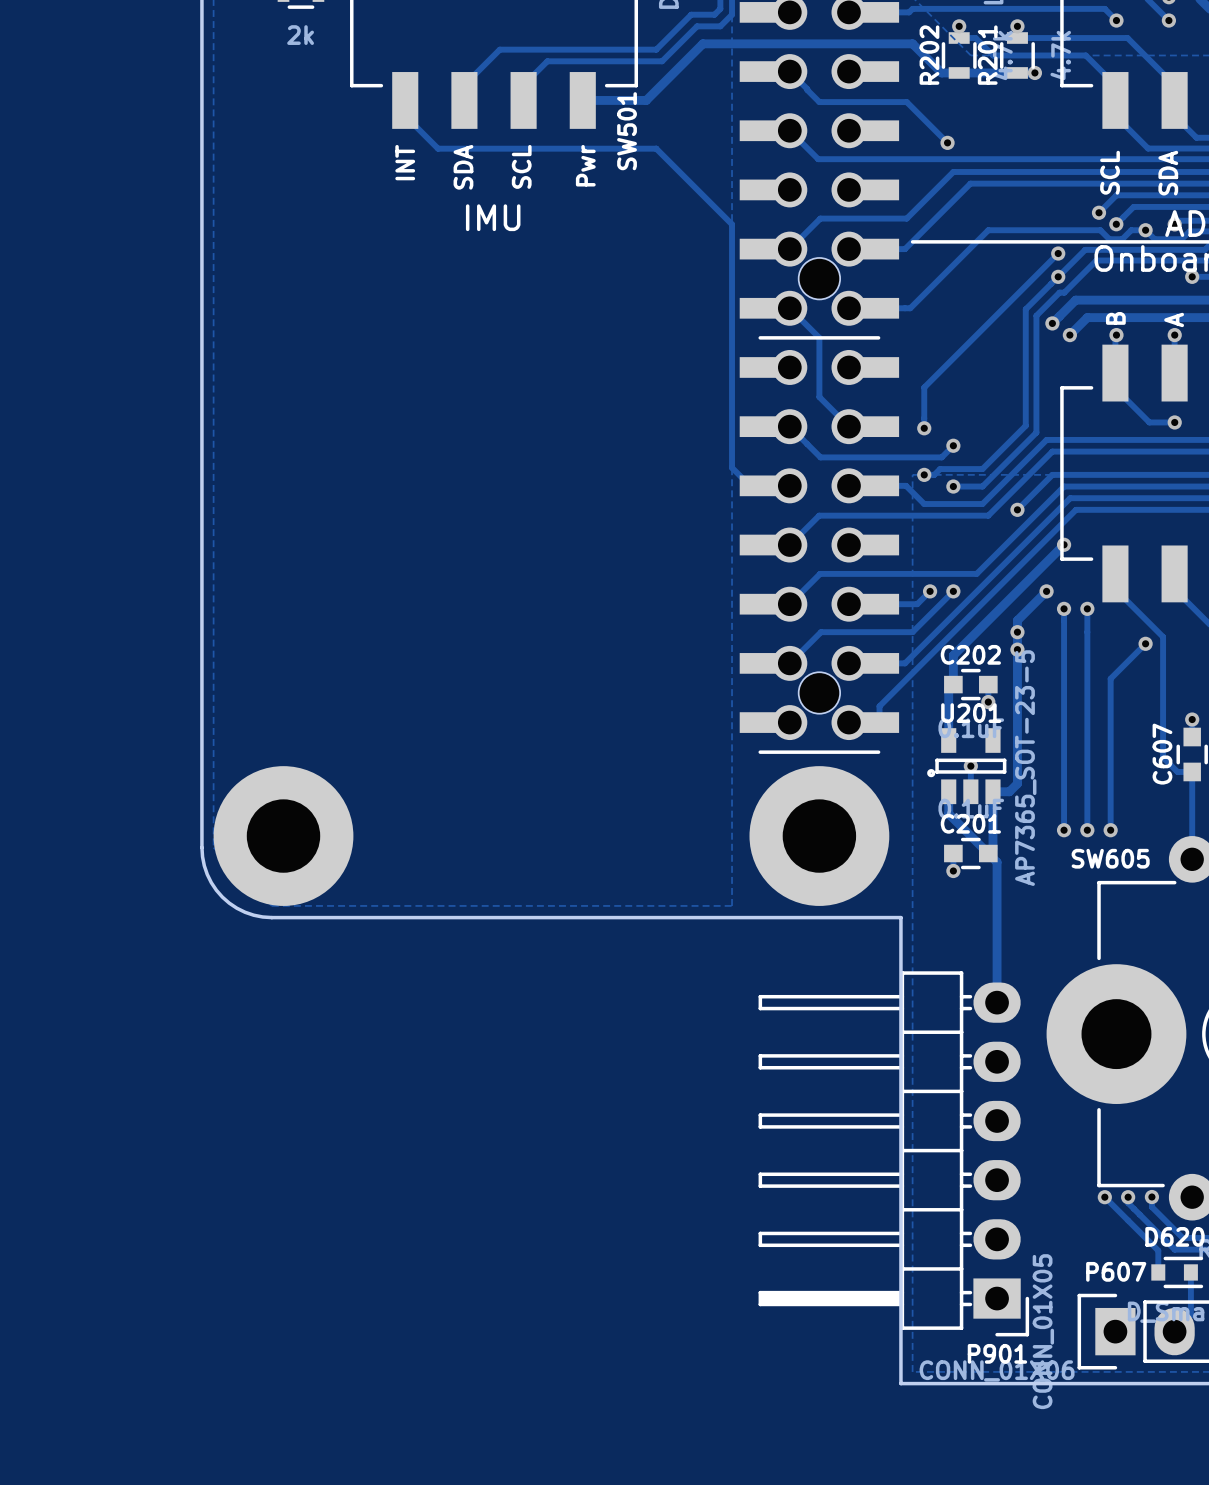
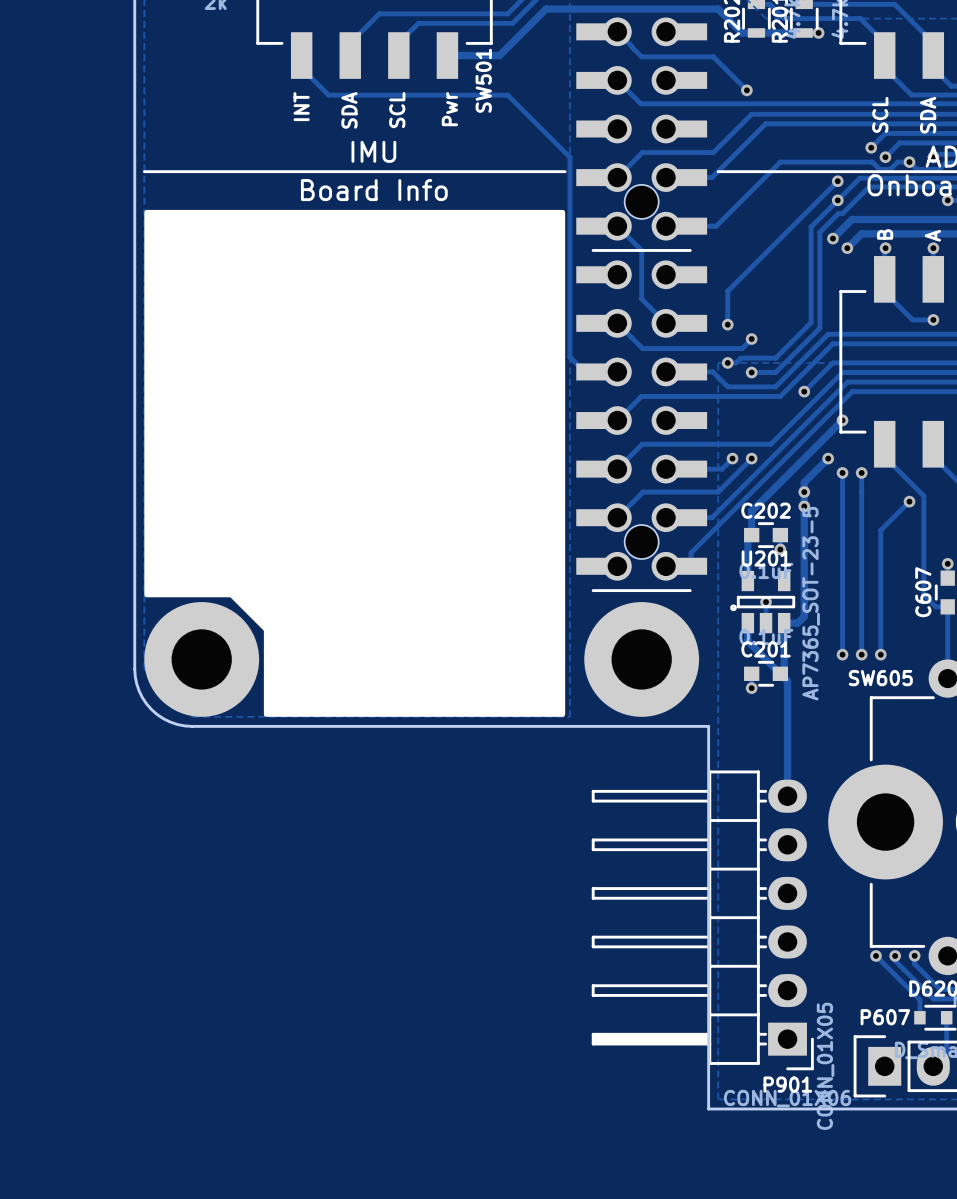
line: none -> (144, 171) (565, 171)
text: none -> Board Info (374, 190)
drawing: none -> [144, 209, 566, 717]

